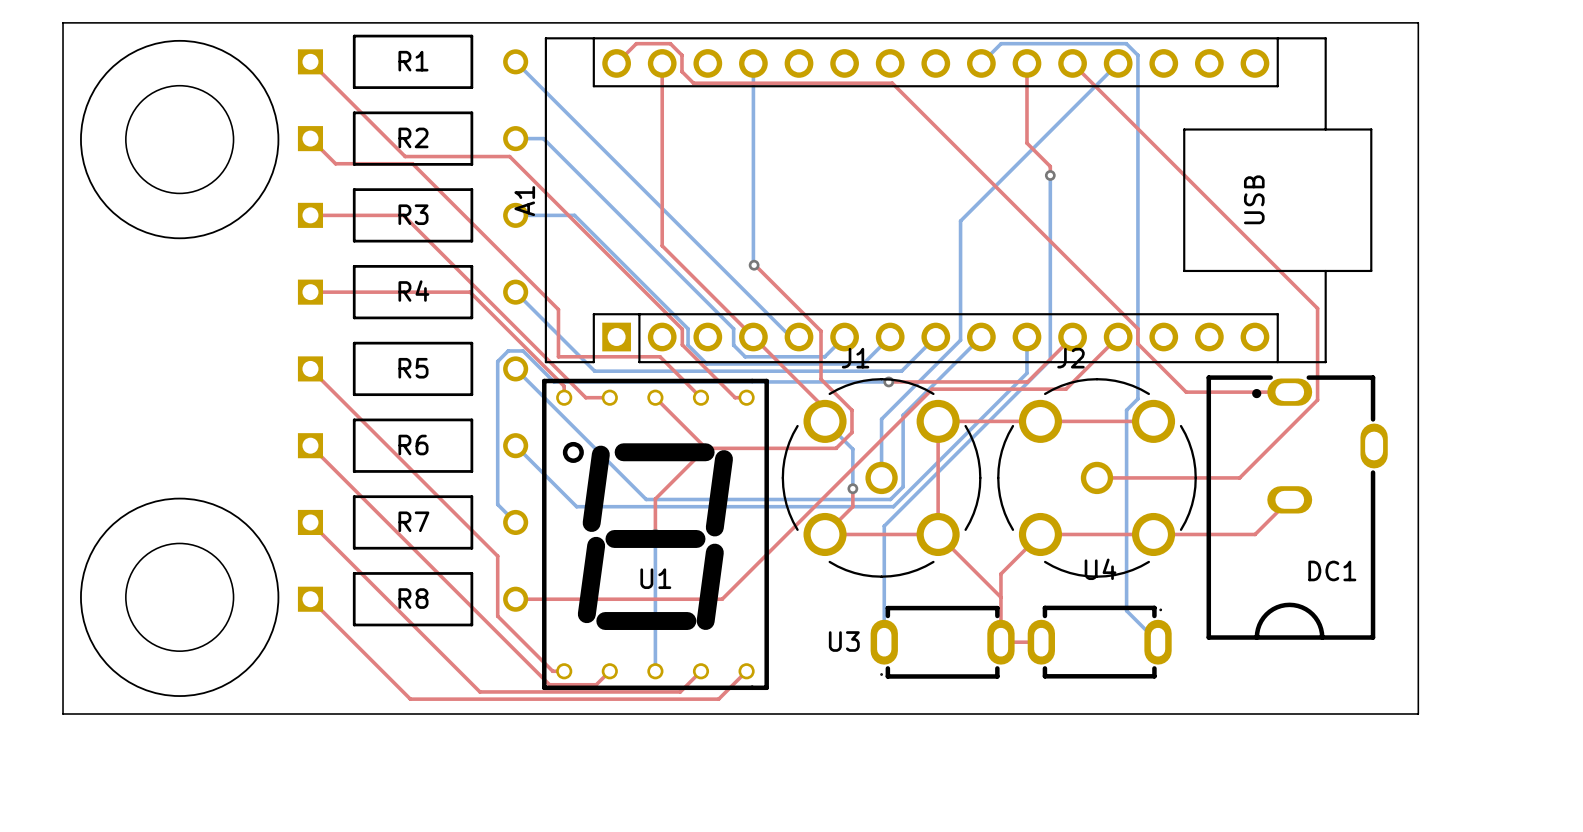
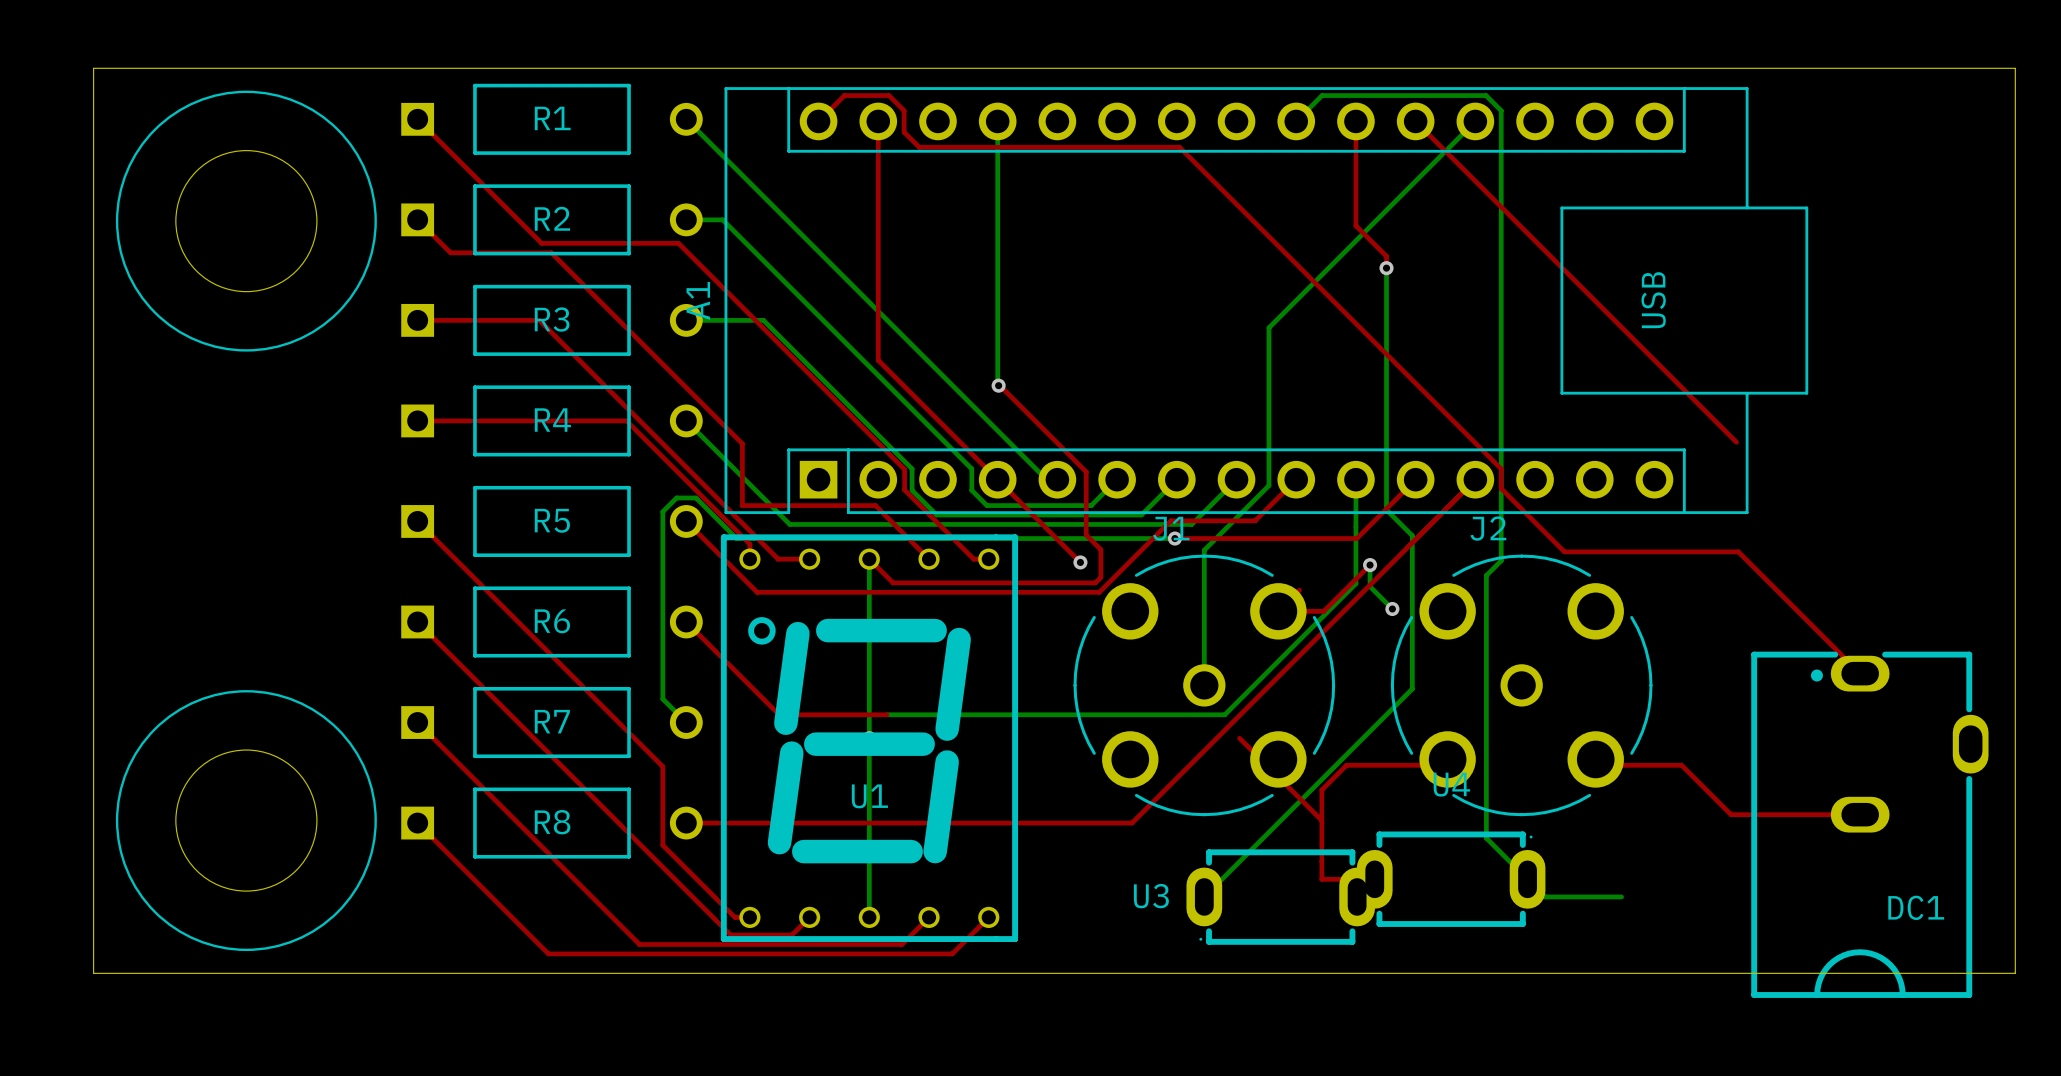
board edge: (1418, 22) (1418, 713) -> (1868, 68) (2015, 68) (2015, 973) (1868, 973)
top track: (1317, 308) (1317, 400) (1239, 477) (1096, 477) -> none
top track: none -> (1296, 479) (1255, 520) (1170, 520) (1099, 592) (757, 592) (686, 521)
bottom track: (981, 337) (903, 415) (903, 486) (890, 499) (646, 499) (515, 368) -> none
bottom track: (960, 340) (881, 419) (881, 477) -> (1268, 483) (1204, 550) (1204, 685)
bottom track: (1050, 360) (884, 526) (884, 642) -> (1386, 509) (1412, 535) (1412, 688) (1204, 896)
bottom track: (1026, 373) (893, 506) (576, 506) (515, 445) -> (1355, 527) (1355, 583) (1224, 714) (886, 714)
top track: (1066, 389) (932, 389) (722, 599) -> (1407, 547) (1132, 823) (956, 823)
top track: (832, 390) (851, 410) (851, 432) (836, 448) (706, 448) -> (1100, 549) (1100, 577) (1095, 582) (893, 582)
top track: none -> (1700, 551) (1738, 551) (1860, 673)
bottom track: none -> (869, 559) (869, 738)
top track: none -> (1370, 565) (1323, 611) (1278, 611) (1299, 590)
bottom track: none -> (1370, 565) (1370, 586) (1392, 608)
via: none -> (1370, 565)
top track: (673, 415) (706, 448) -> none
bottom track: (825, 421) (852, 449) (852, 488) -> none
top track: (1153, 421) (938, 421) (938, 534) (825, 534) (852, 506) (852, 488) -> none
via: none -> (1392, 608)
top track: none -> (686, 621) (779, 714) (886, 714)
top track: (706, 448) (655, 498) (655, 534) -> none
J1 position: (881, 477) -> (1204, 685)
J2 position: (1096, 477) -> (1521, 685)
via position: (852, 488) -> (1080, 562)
top track: (1289, 499) (1255, 534) (1040, 534) (1019, 555) -> (1447, 759) (1441, 765) (1346, 765)
DC1 position: (1297, 507) -> (1869, 824)
top track: none -> (1595, 759) (1601, 765) (1681, 765) (1731, 814) (1860, 814)
U3 position: (942, 642) -> (1280, 897)
bottom track: none -> (1527, 879) (1545, 896) (1621, 896)

